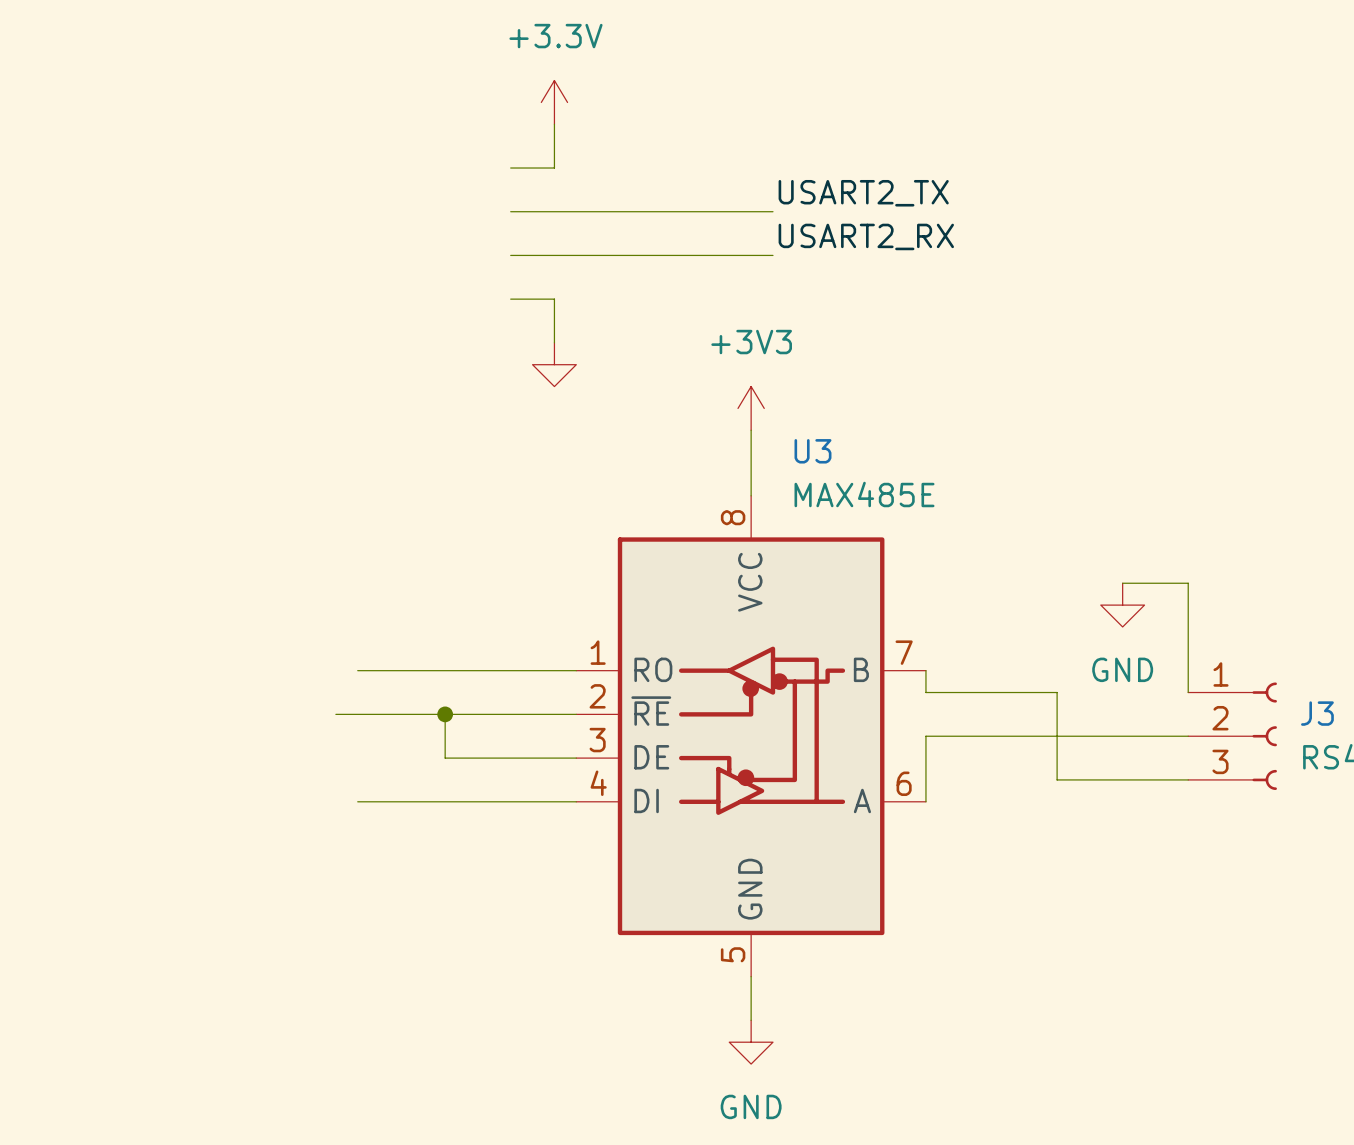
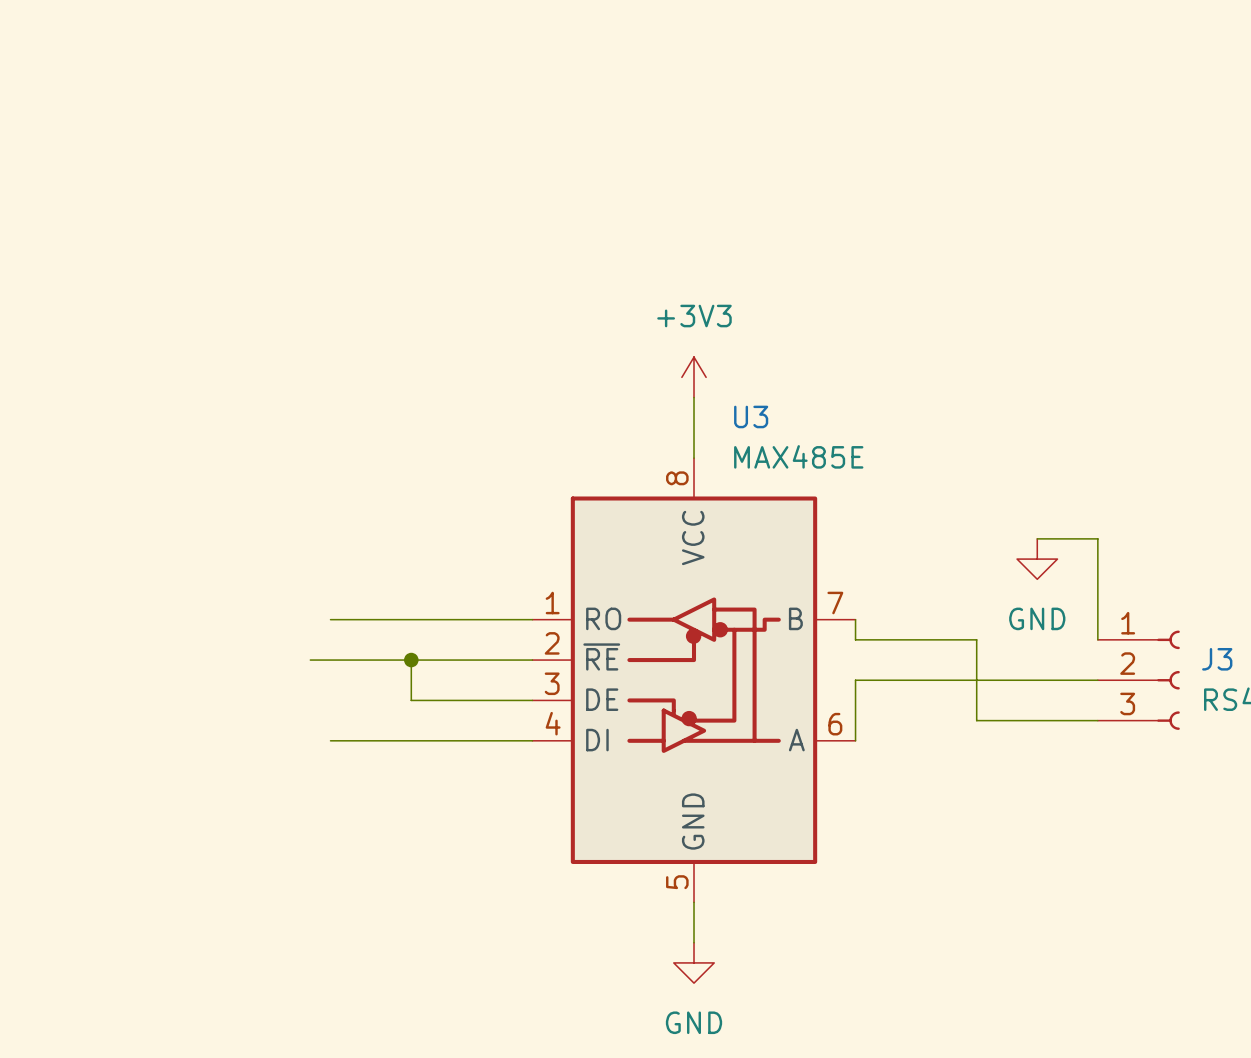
power symbol: +3.3V (554, 102) -> none
wire: (554, 124) (554, 168) (510, 168) -> none
label: USART2_TX (863, 193) -> none
wire: (510, 211) (772, 211) -> none
label: USART2_RX (866, 236) -> none
wire: (510, 255) (772, 255) -> none
wire: (510, 299) (554, 299) (554, 342) -> none
power symbol: (554, 364) -> none

